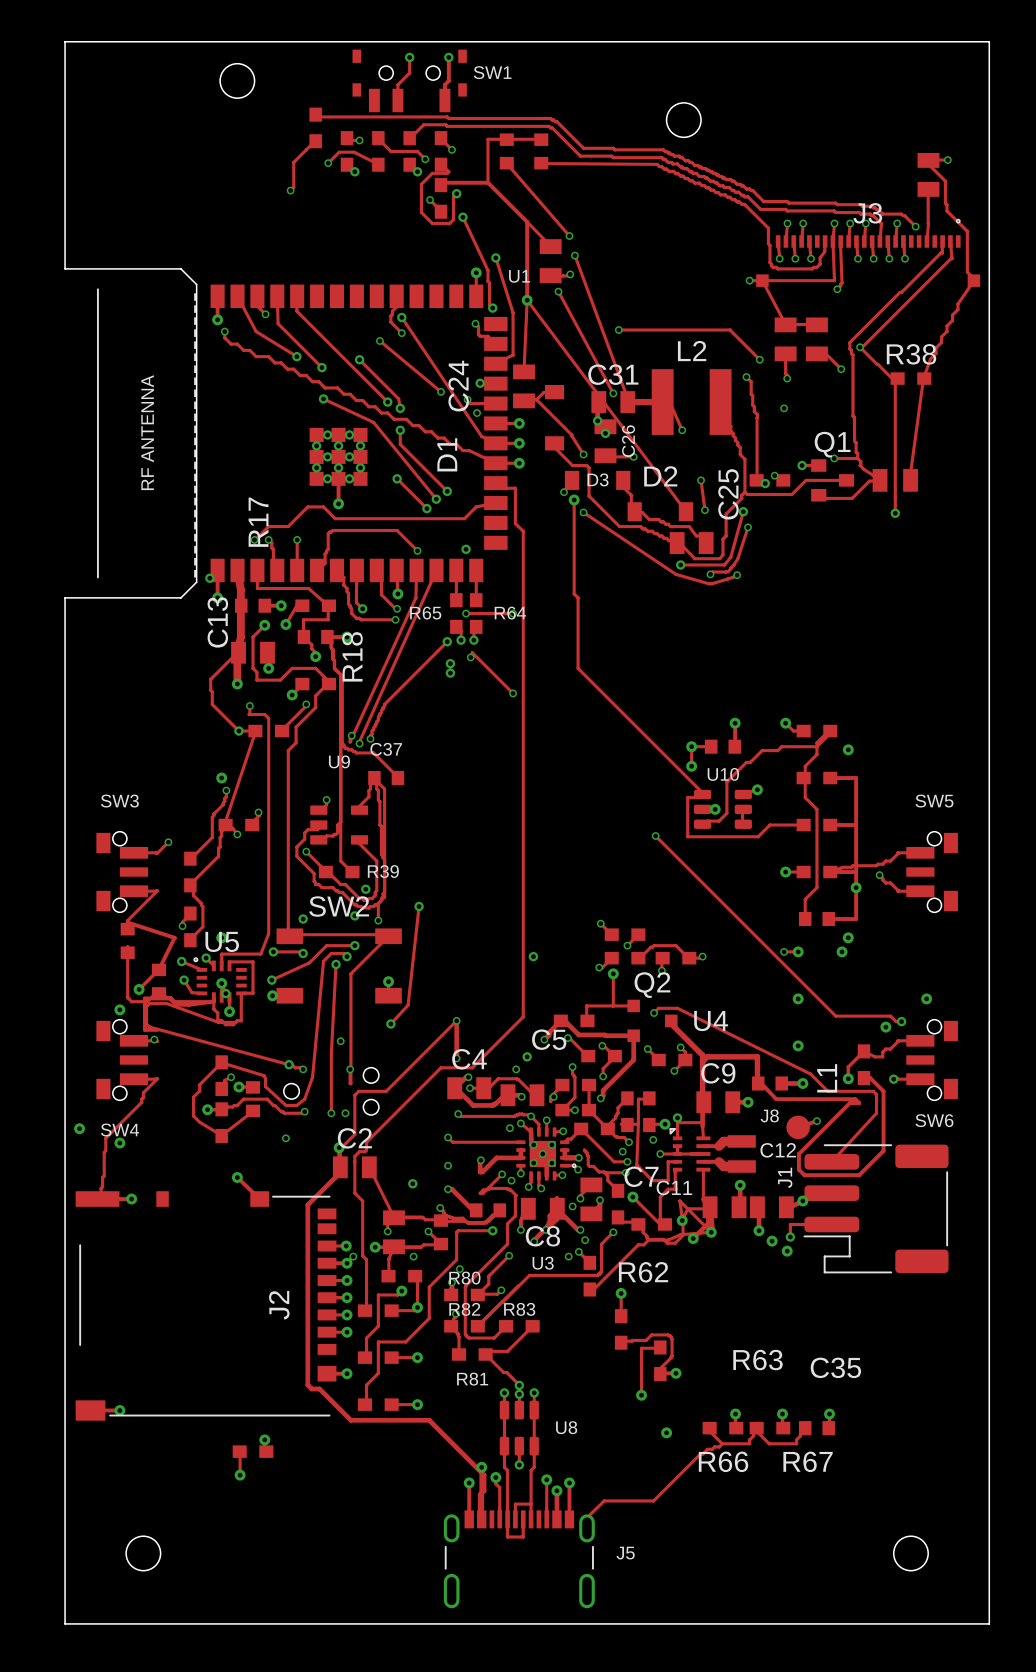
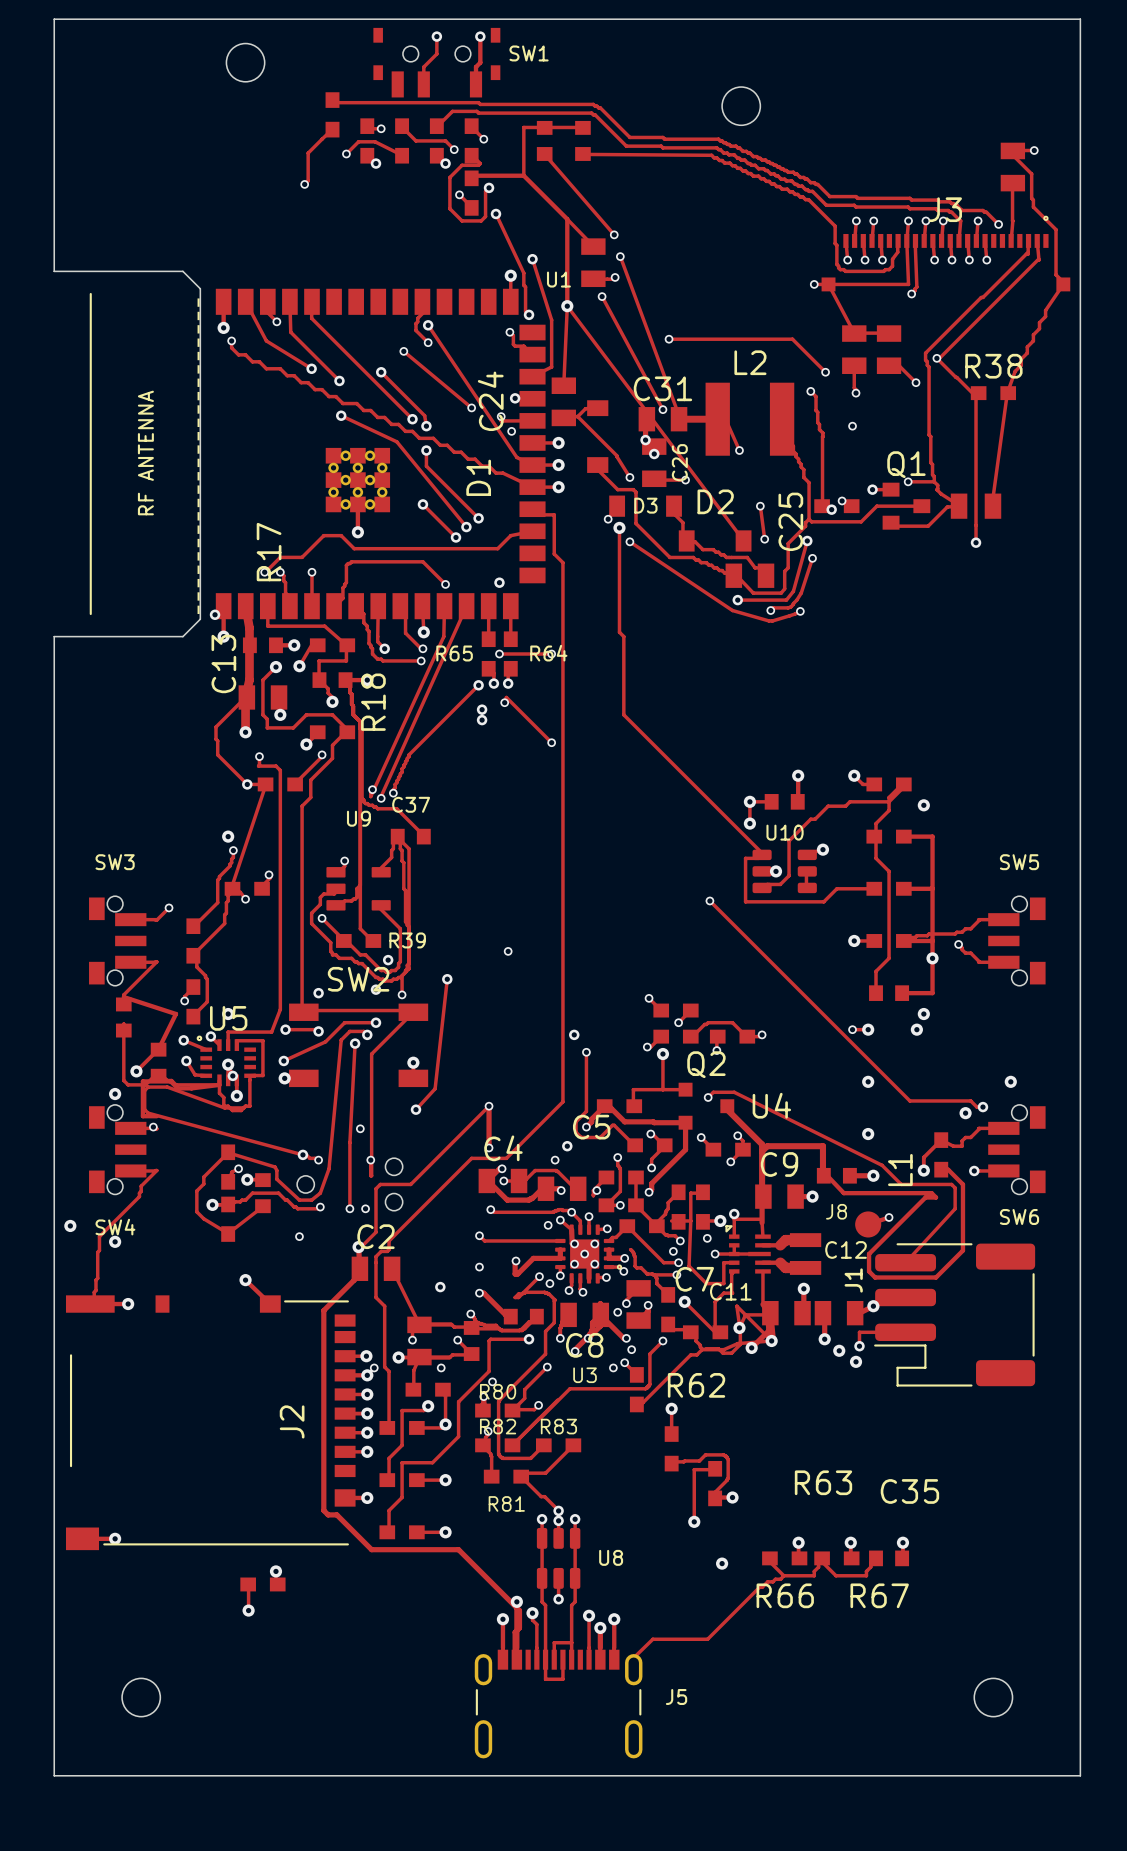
via: none -> (508, 951)
track: none -> (586, 1052) (586, 1111) (576, 1121) (576, 1132) (581, 1137) (600, 1137) (612, 1125)
via position: (567, 1038) -> (586, 1052)

